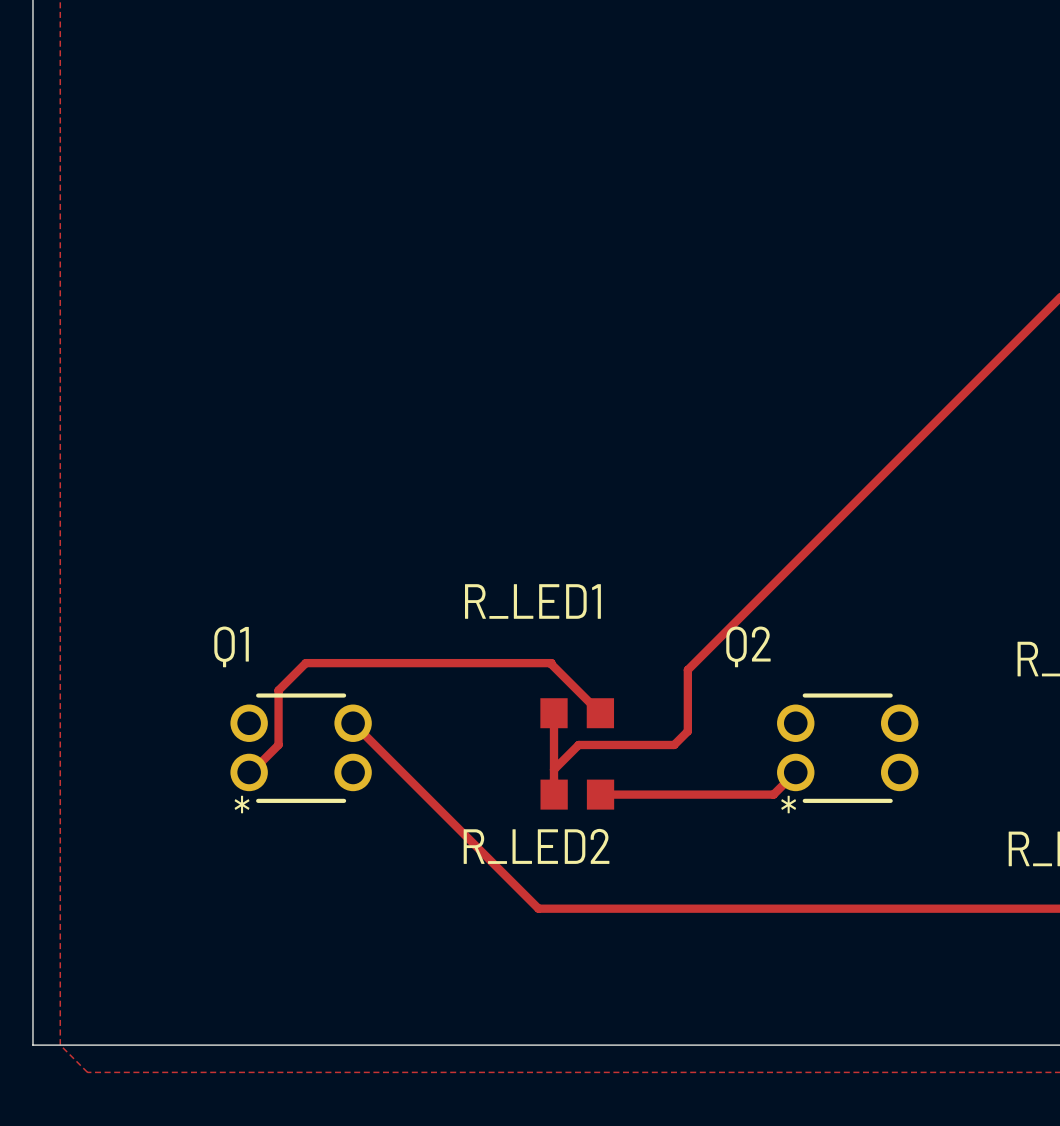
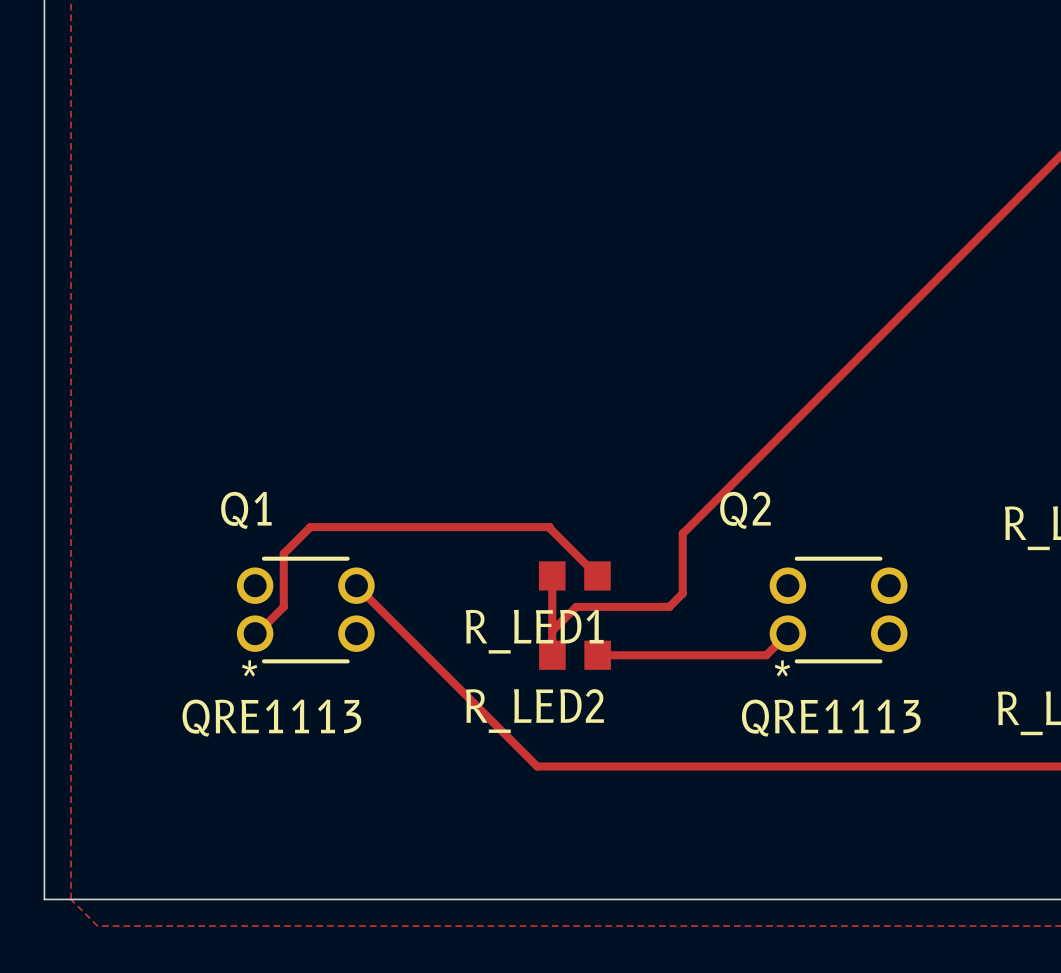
R_LED1 name position: R_LED1 (532, 601) -> R_LED1 (534, 631)
Q1 value: none -> QRE1113 (271, 718)
Q2 value: none -> QRE1113 (831, 718)

